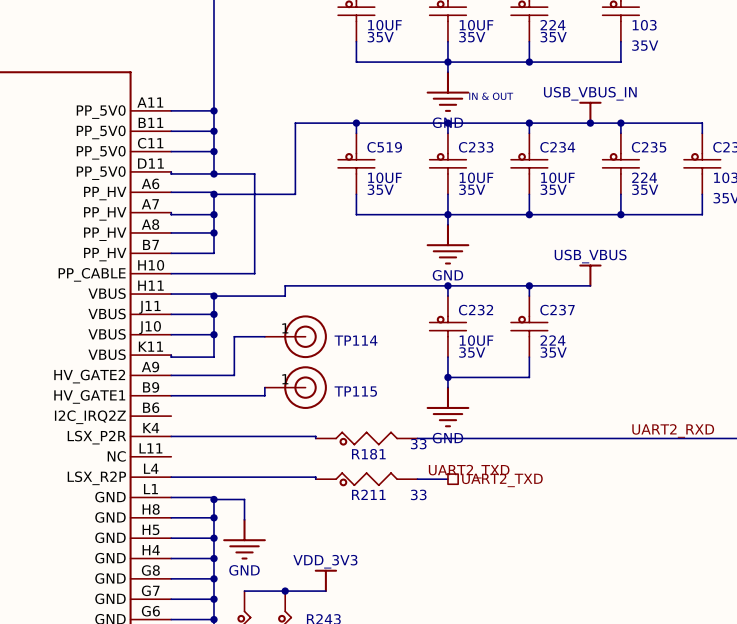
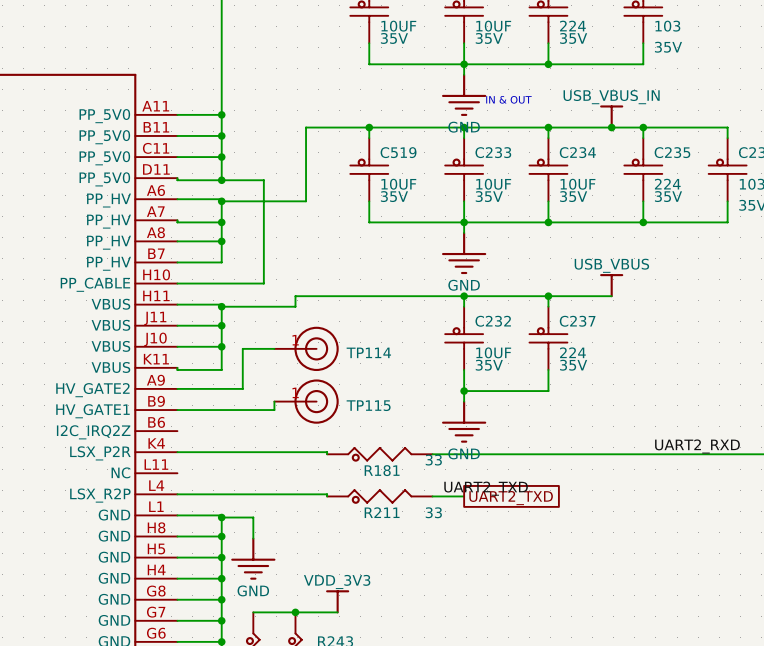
global label: none -> UART2_TXD (511, 498)
hierarchical label: UART2_TXD (502, 480) -> none

